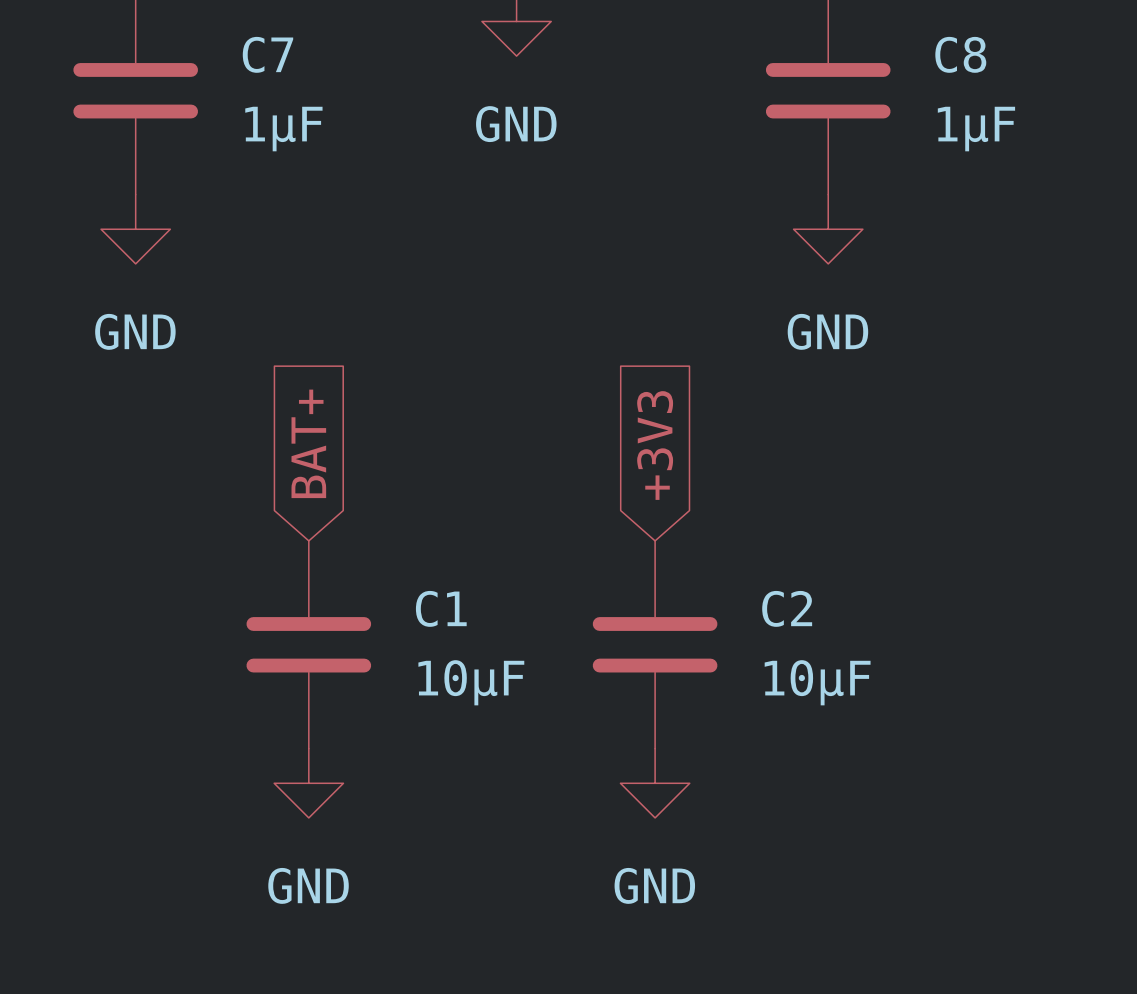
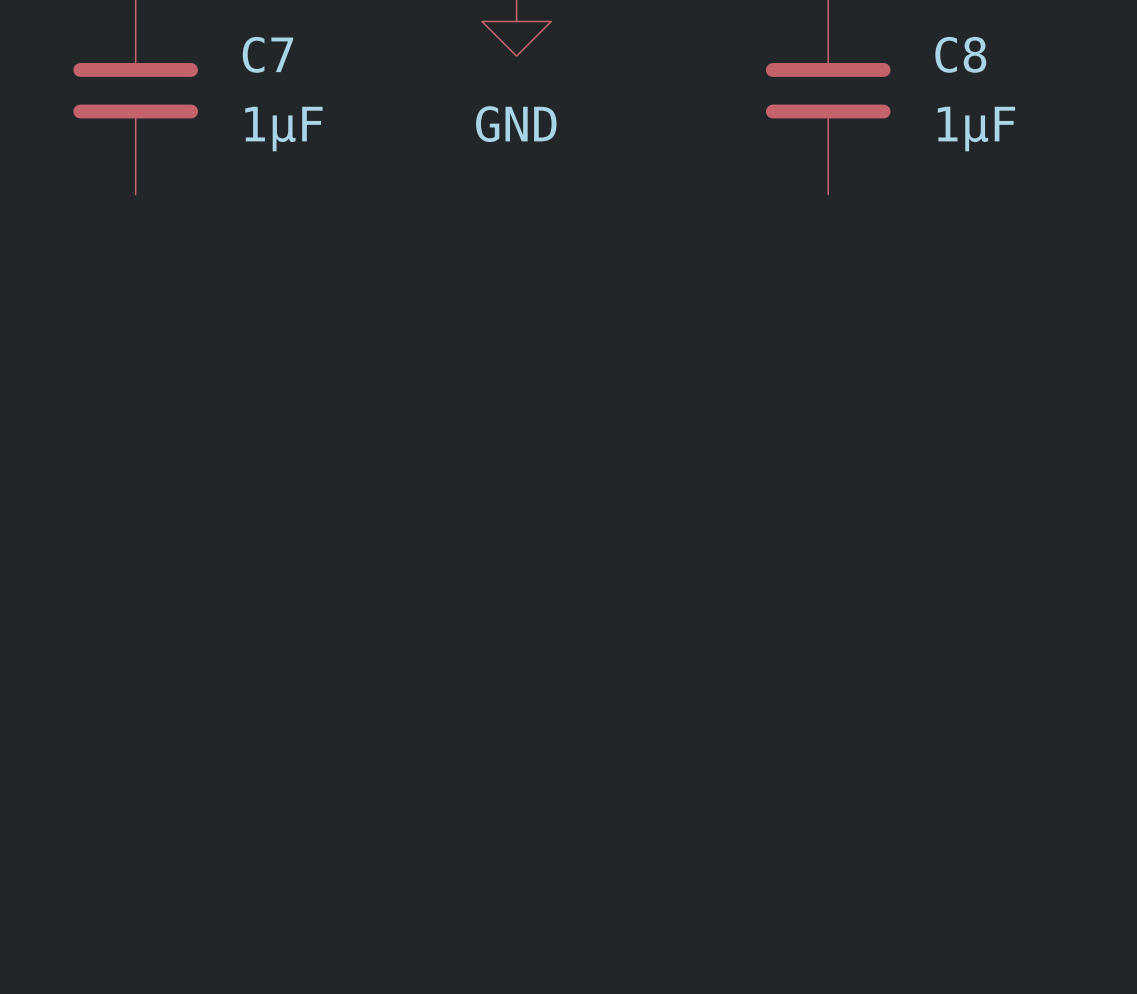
power symbol: GND (135, 229) -> none
power symbol: GND (828, 229) -> none
global label: BAT+ (308, 443) -> none
global label: +3V3 (655, 445) -> none
C1: 10µF (308, 644) -> none
C2: 10µF (655, 644) -> none
power symbol: GND (308, 783) -> none
power symbol: GND (655, 783) -> none

